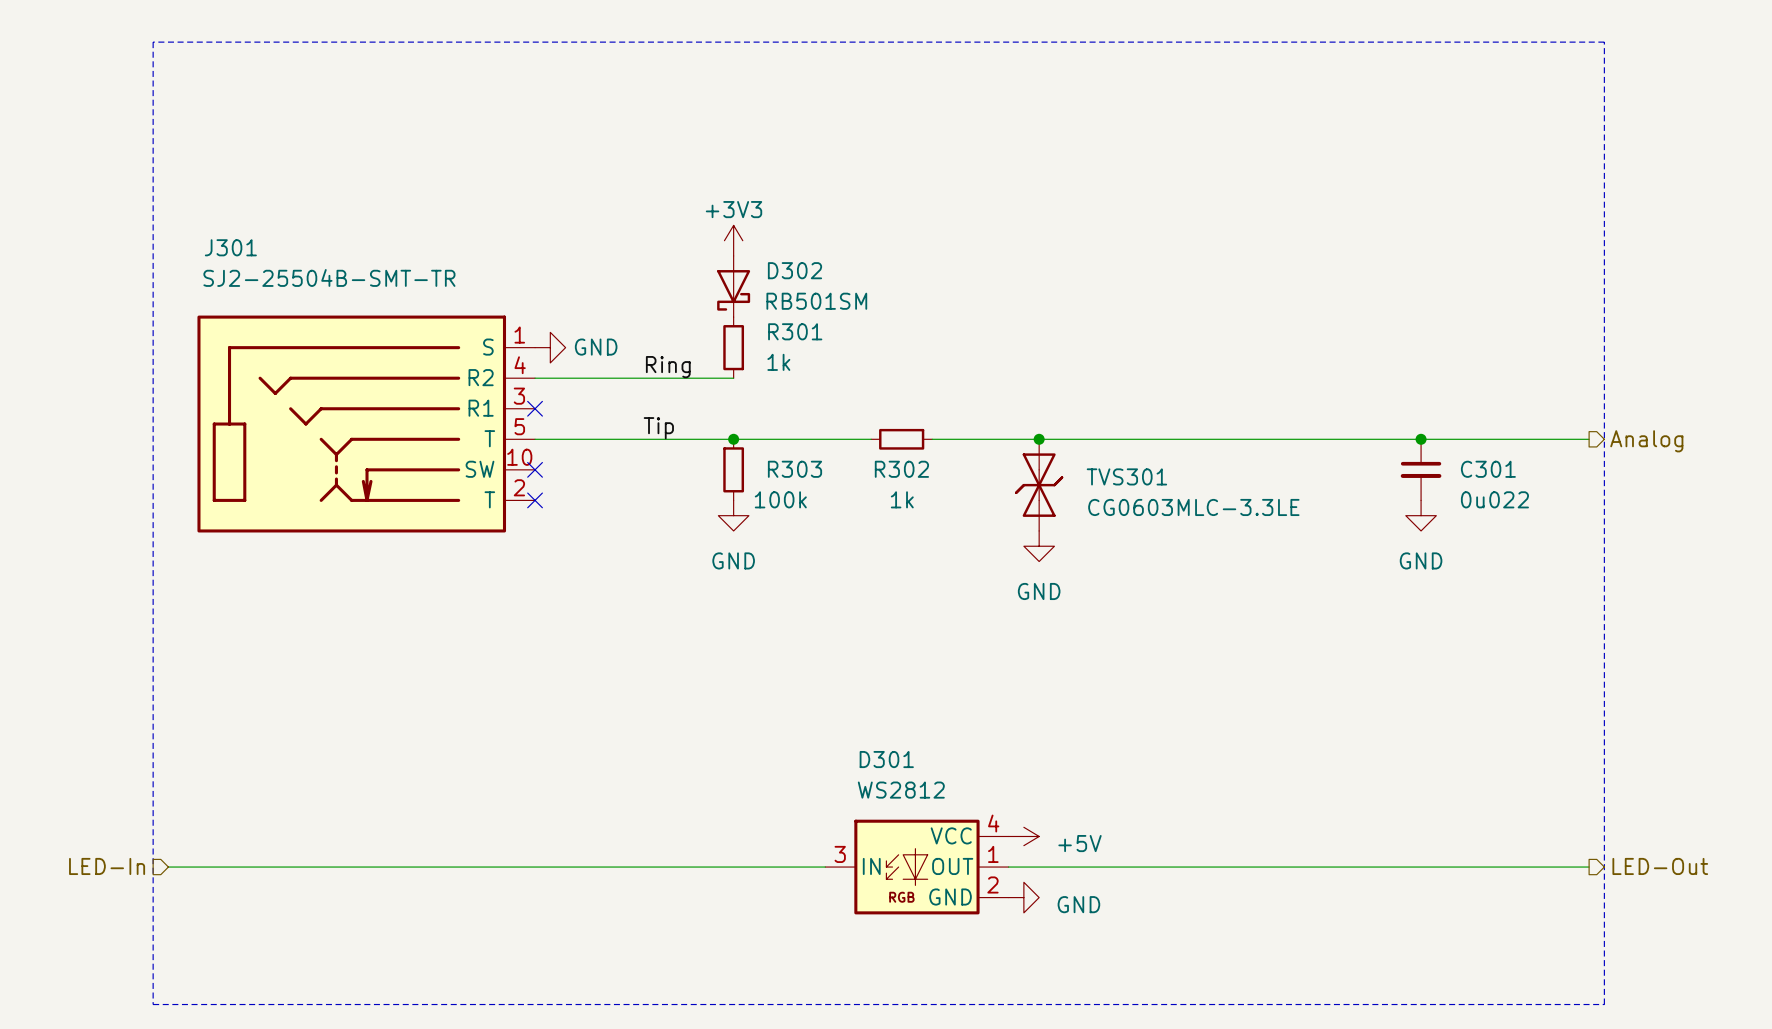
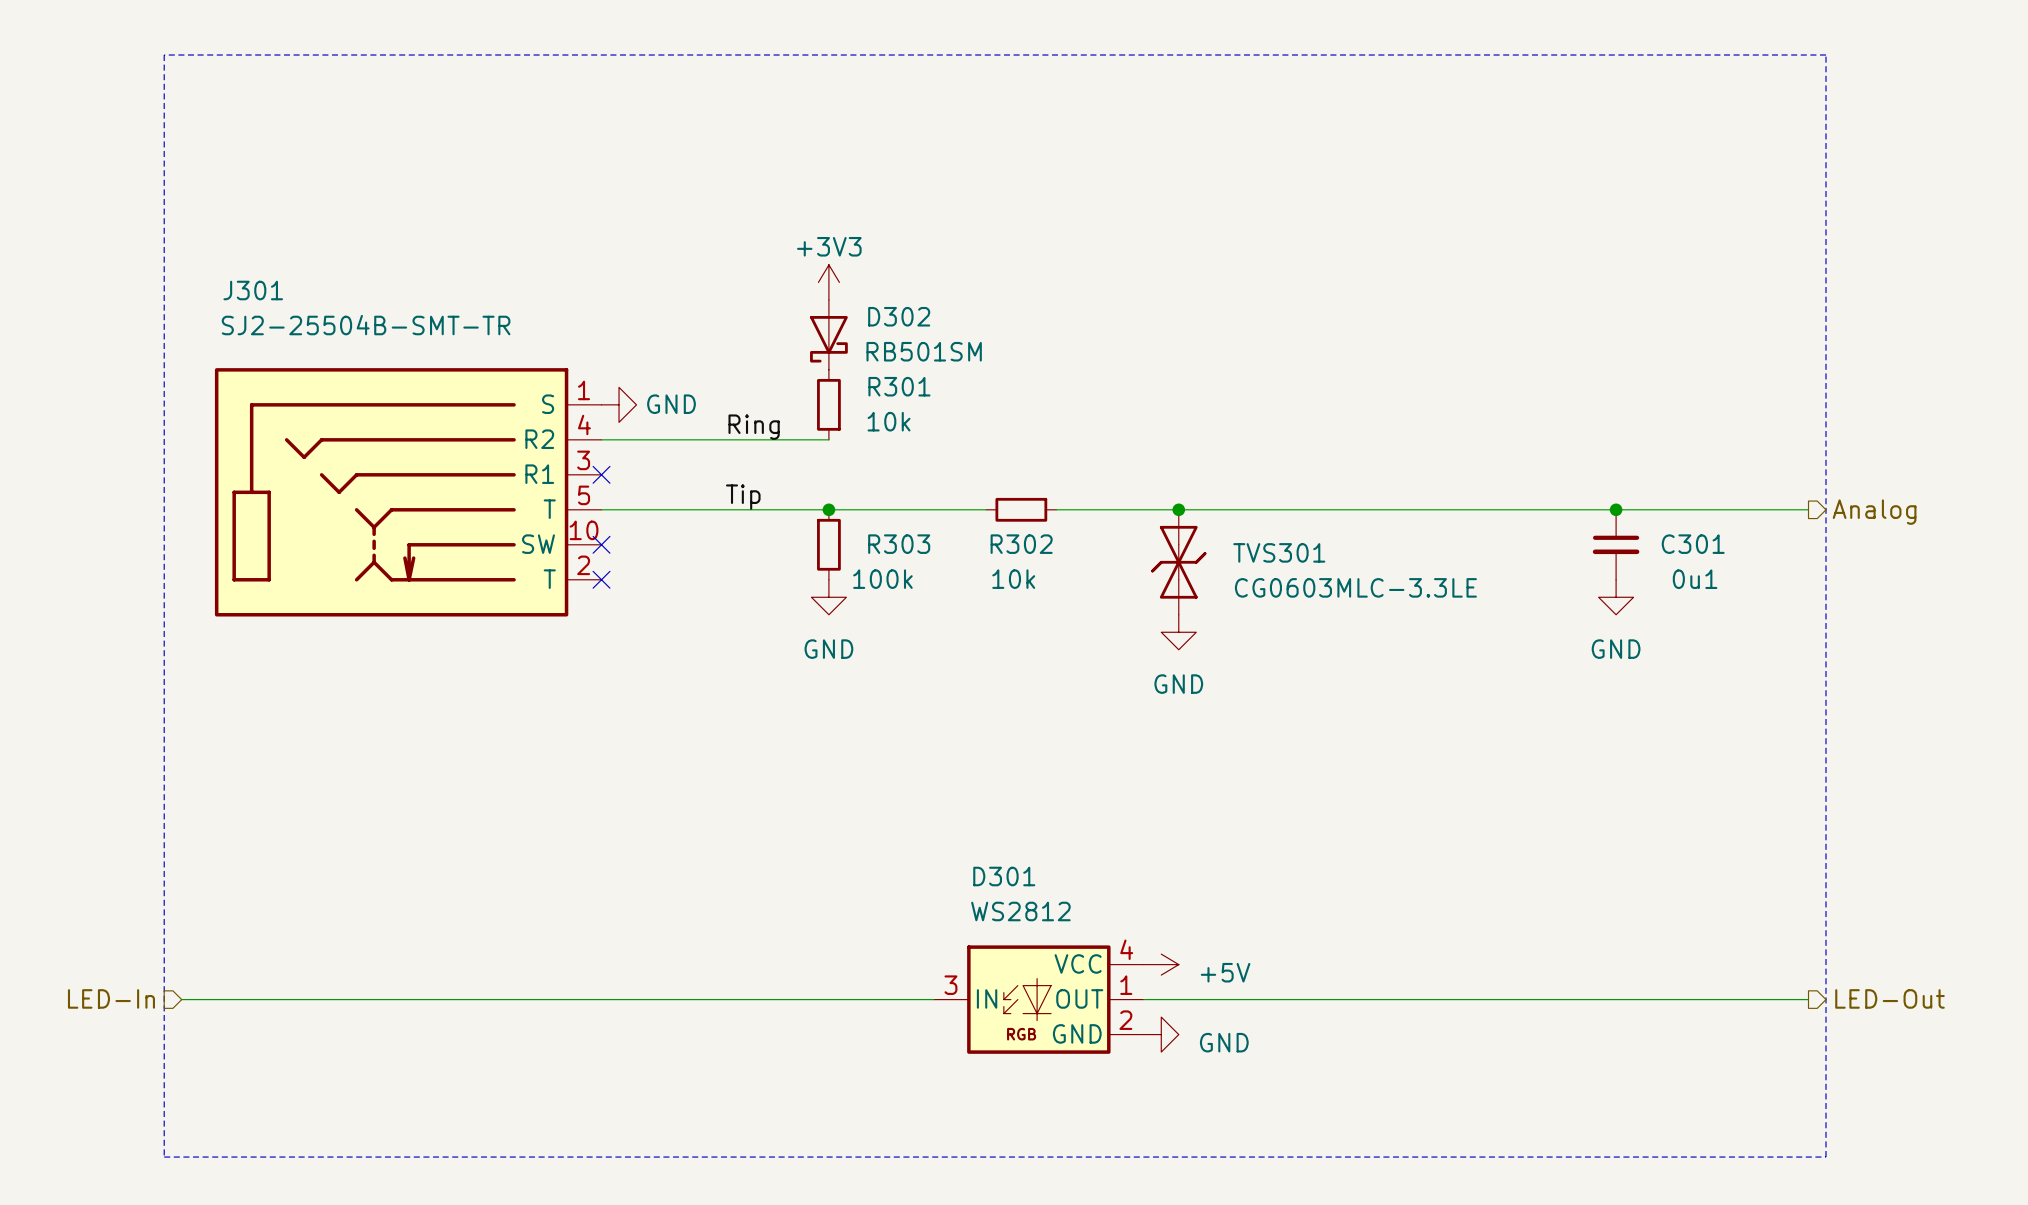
R301 value: 1k (778, 362) -> 10k (889, 421)
R302 value: 1k (902, 499) -> 10k (1013, 579)
C301 value: 0u022 (1494, 499) -> 0u1 (1695, 579)

